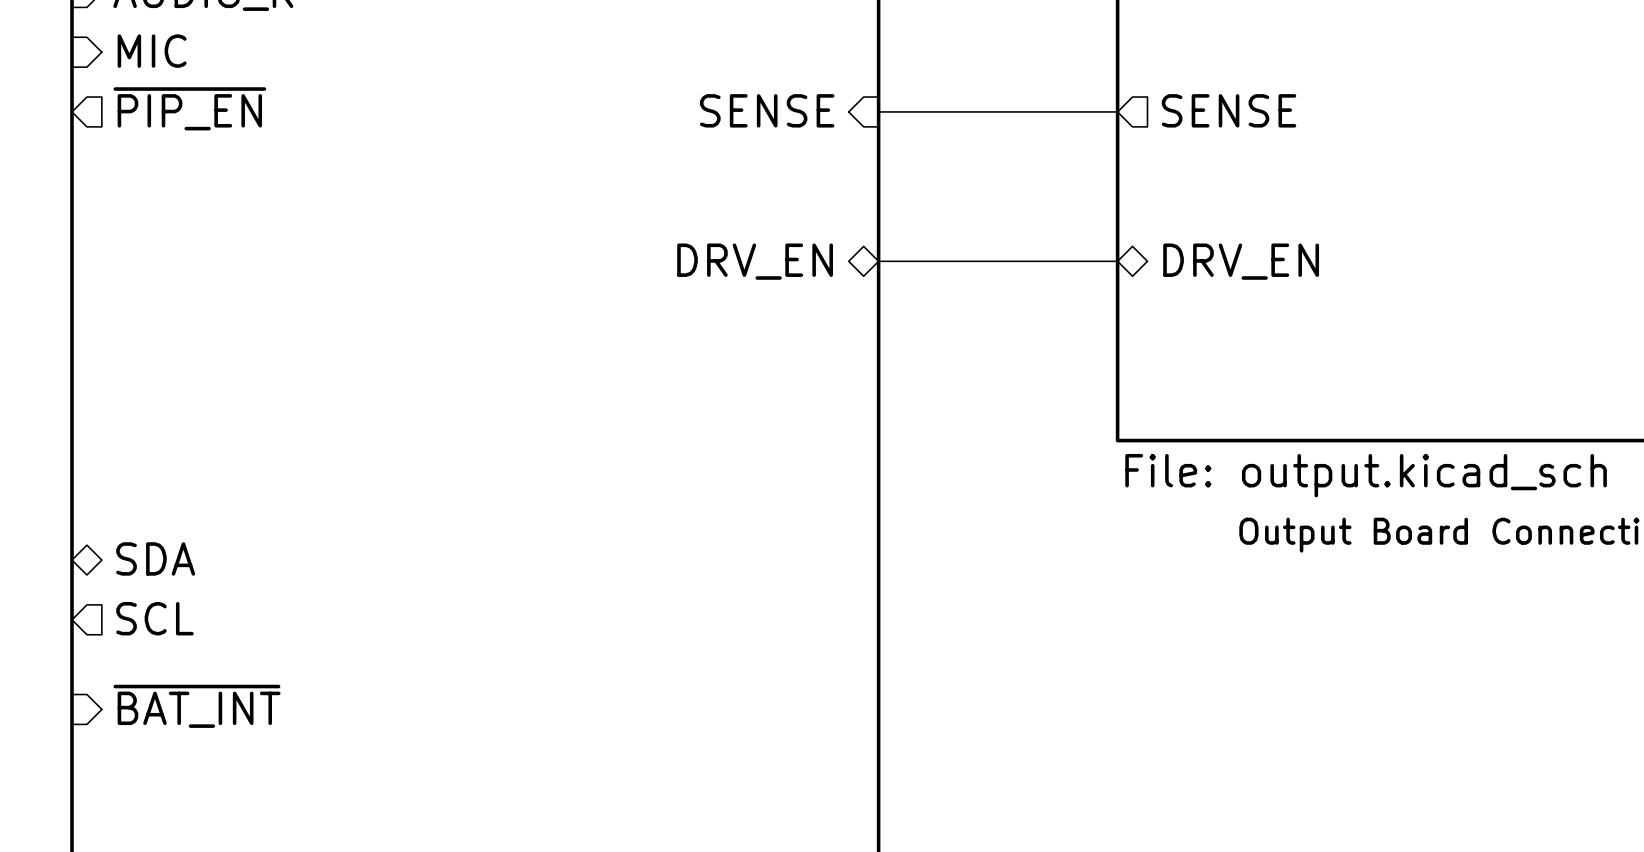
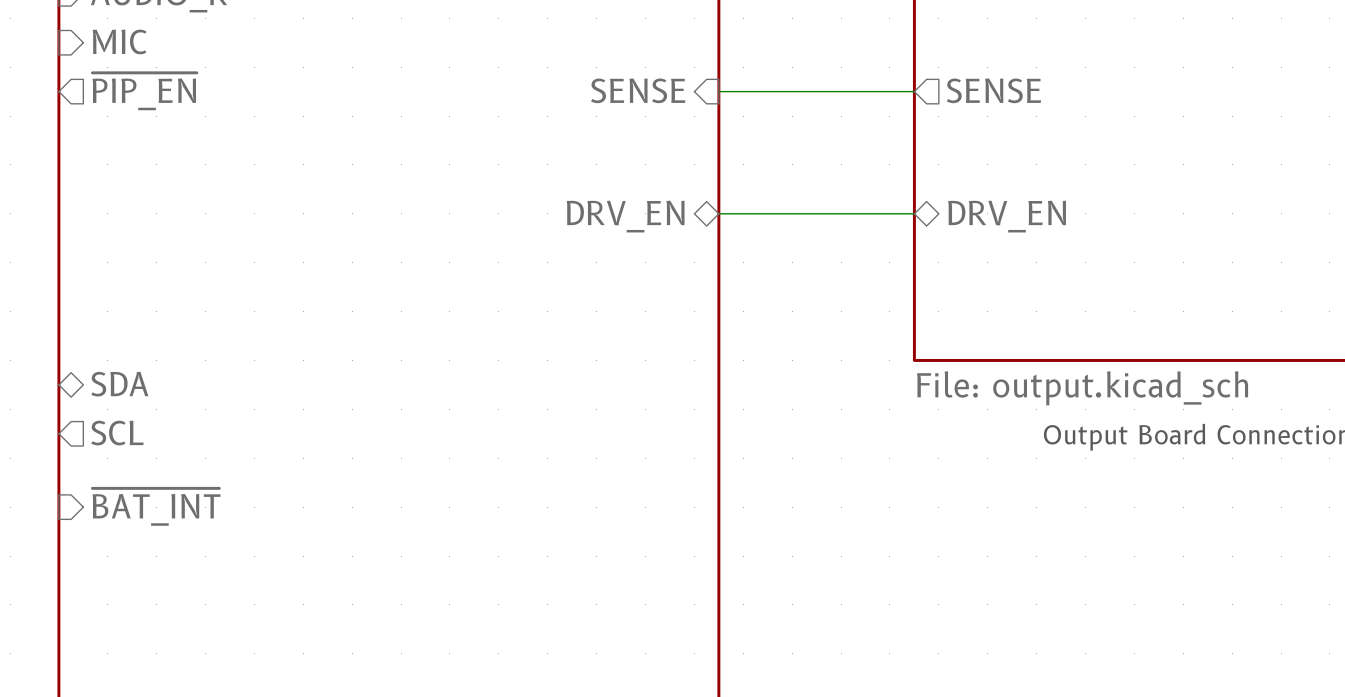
sheet pin: none -> SCL (117, 433)
sheet pin position: SDA (155, 558) -> SDA (119, 384)
sheet pin shape: output (154, 618) -> input (156, 507)
sheet pin: SCL (154, 618) -> ~{BAT_INT} (156, 507)
sheet pin: ~{BAT_INT} (197, 706) -> none

